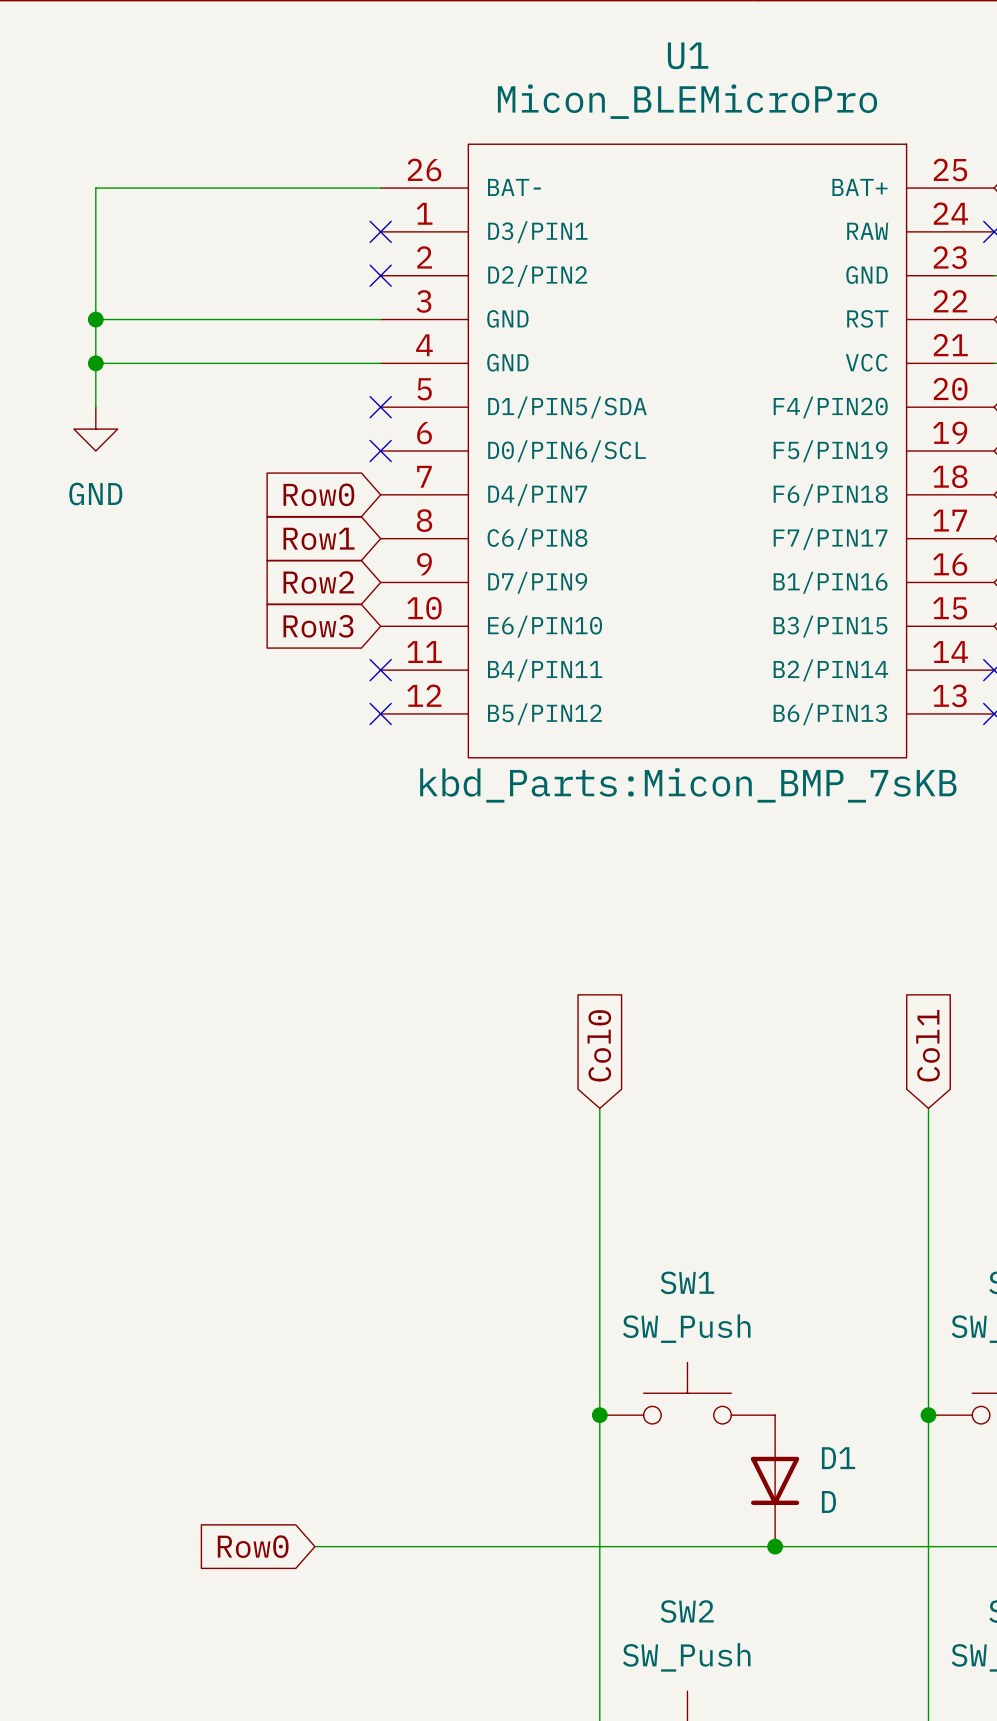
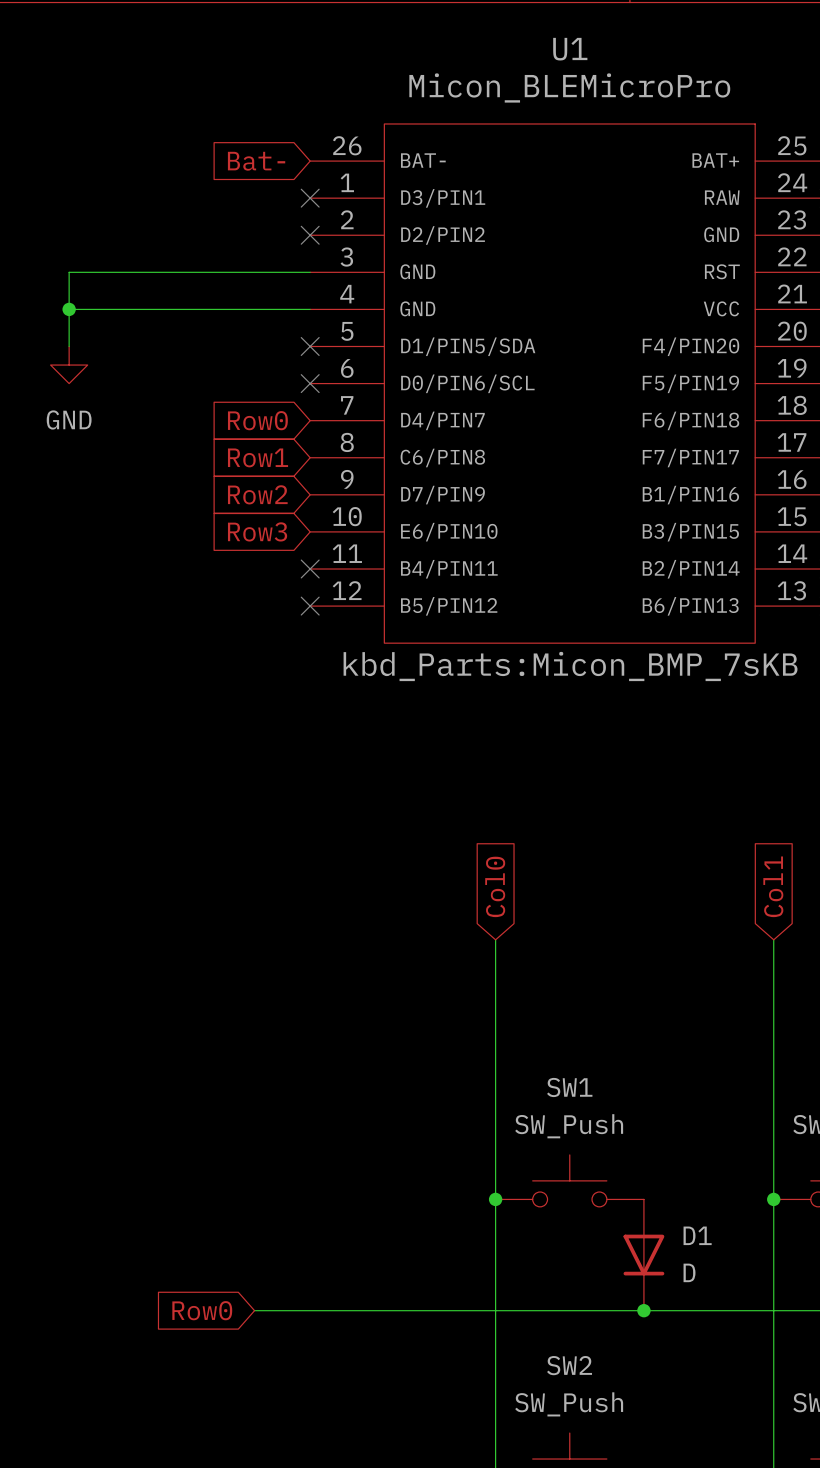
global label: none -> Bat- (256, 161)
wire: (380, 188) (95, 188) (95, 319) -> none
junction: (95, 319) -> none

